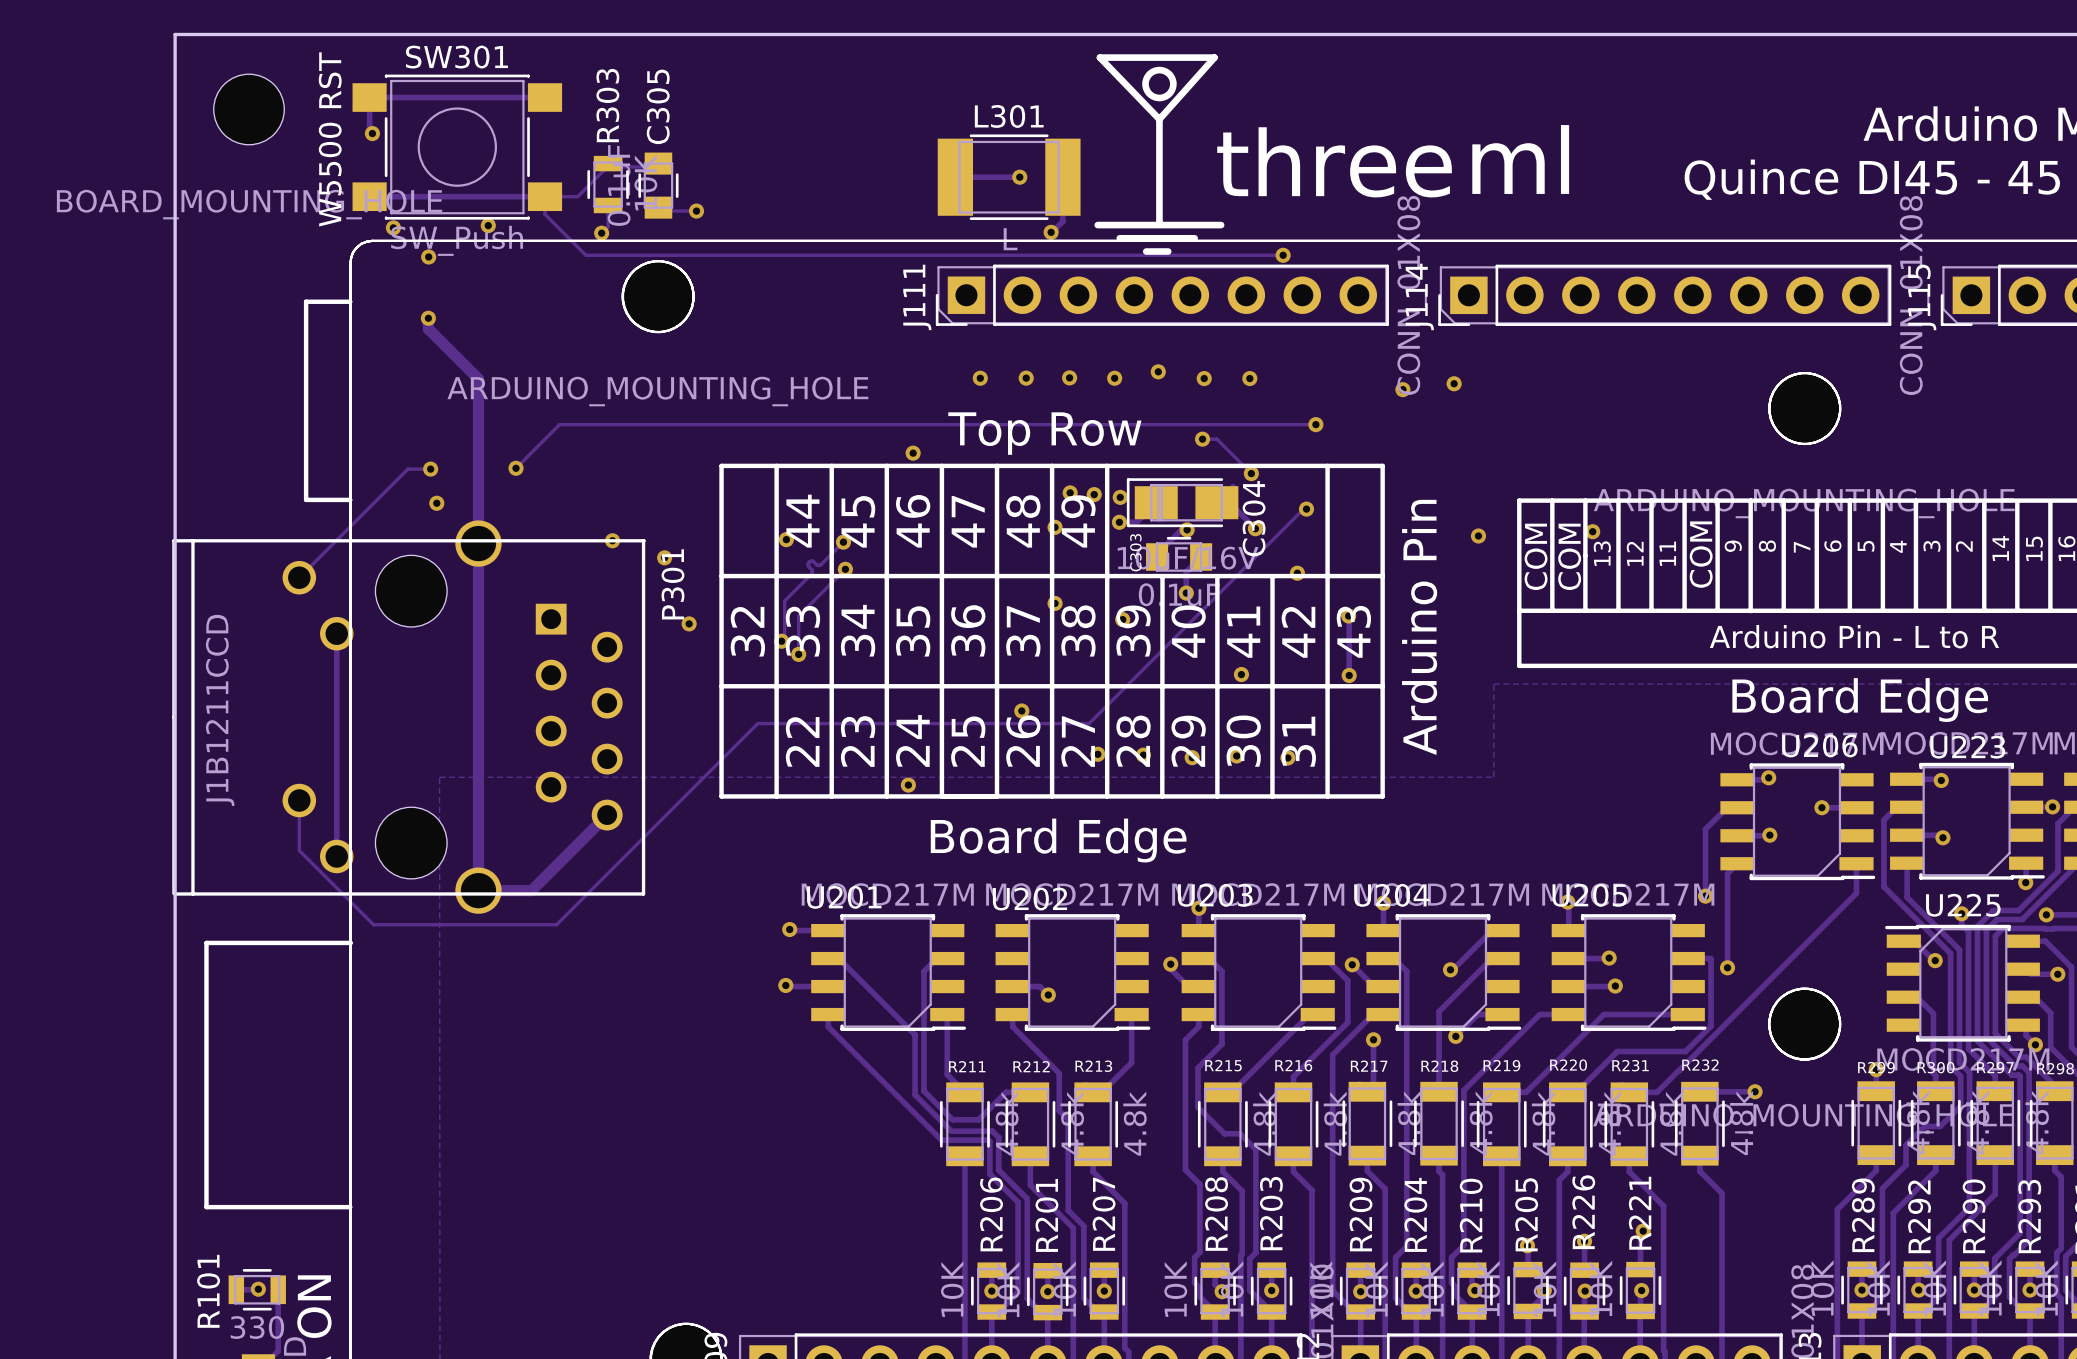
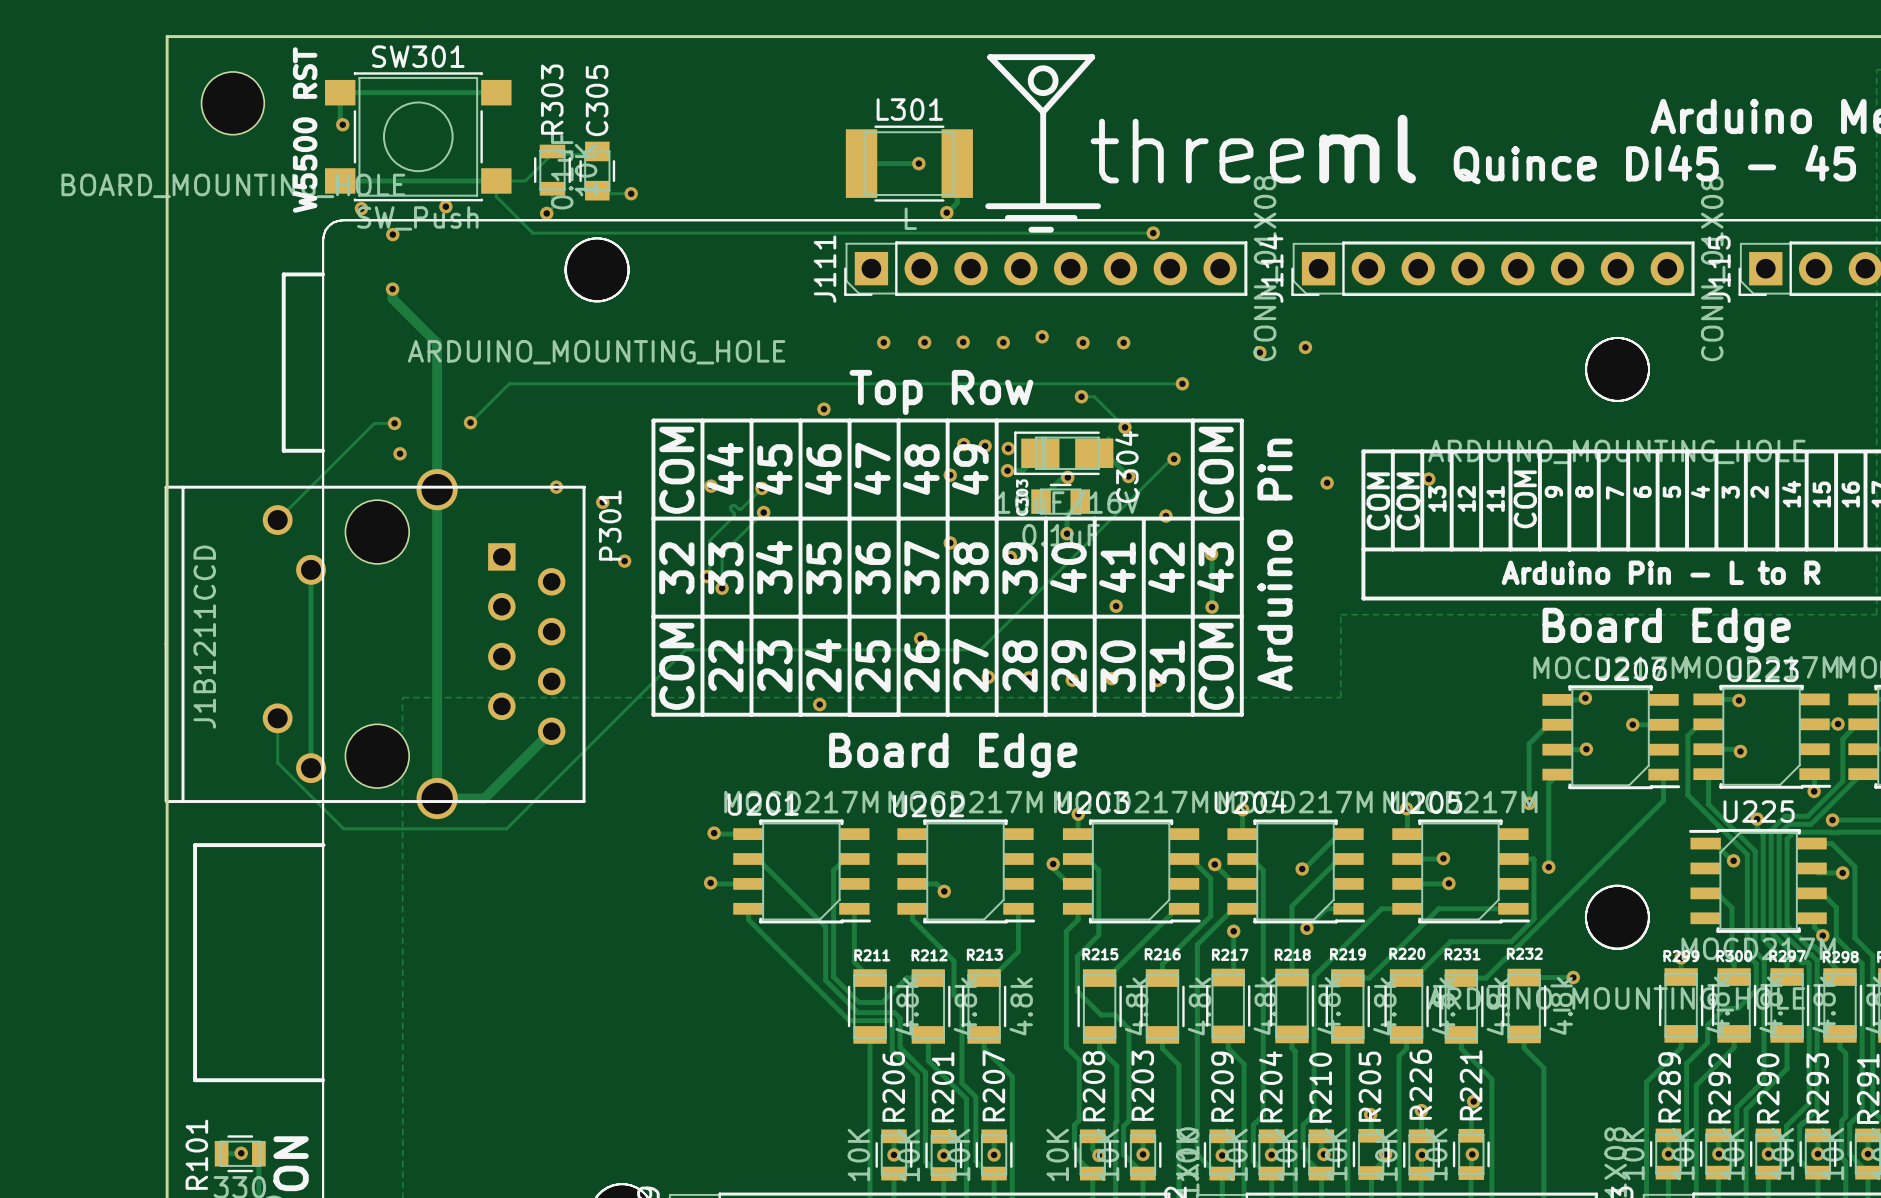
text: none -> COM (676, 470)
text: none -> COM (1216, 470)
text: none -> COM (676, 666)
text: none -> COM (1216, 666)

